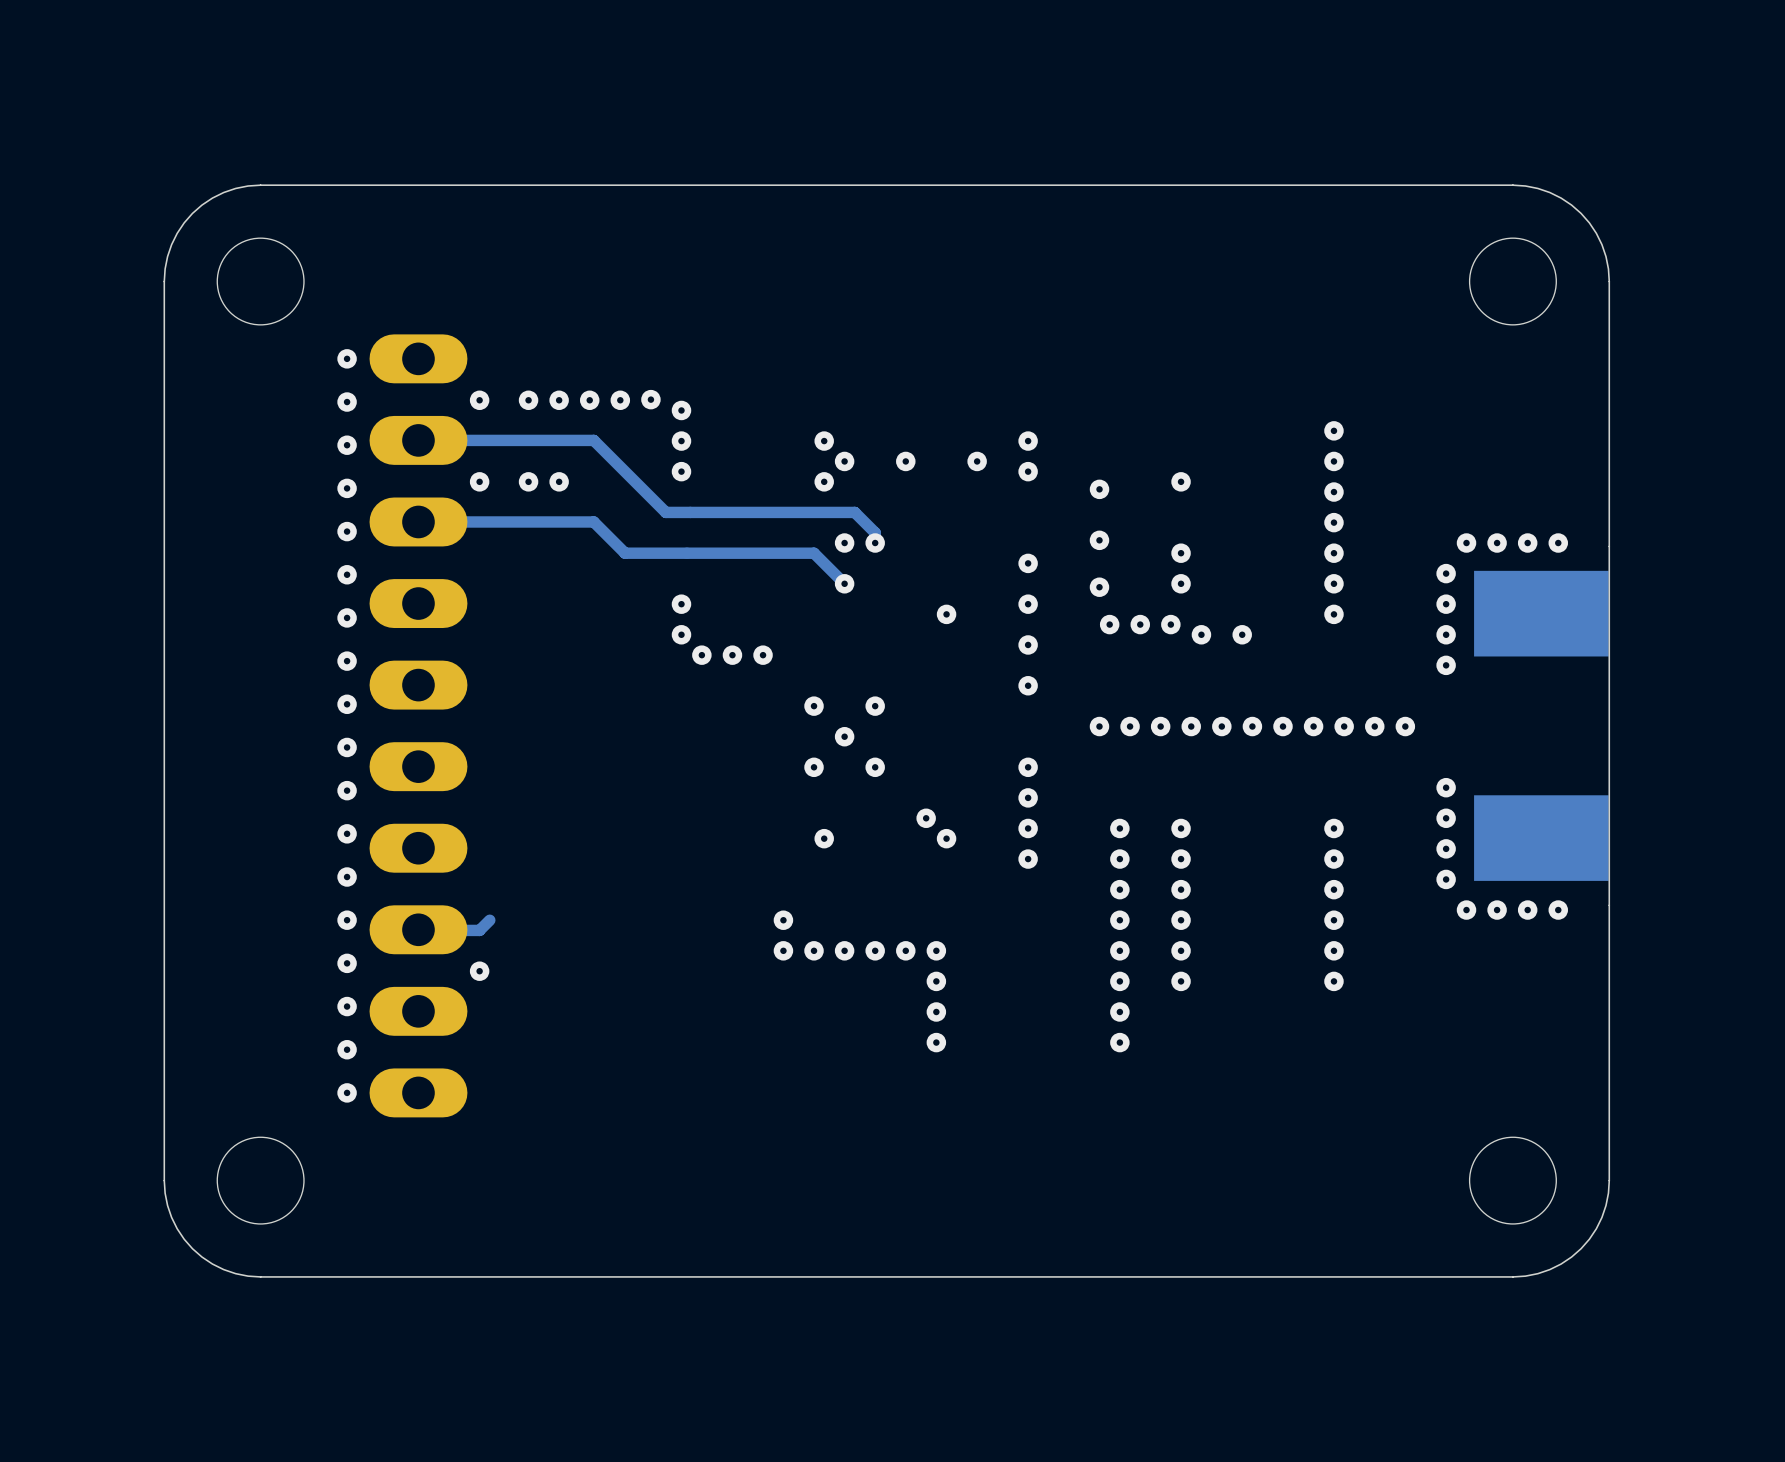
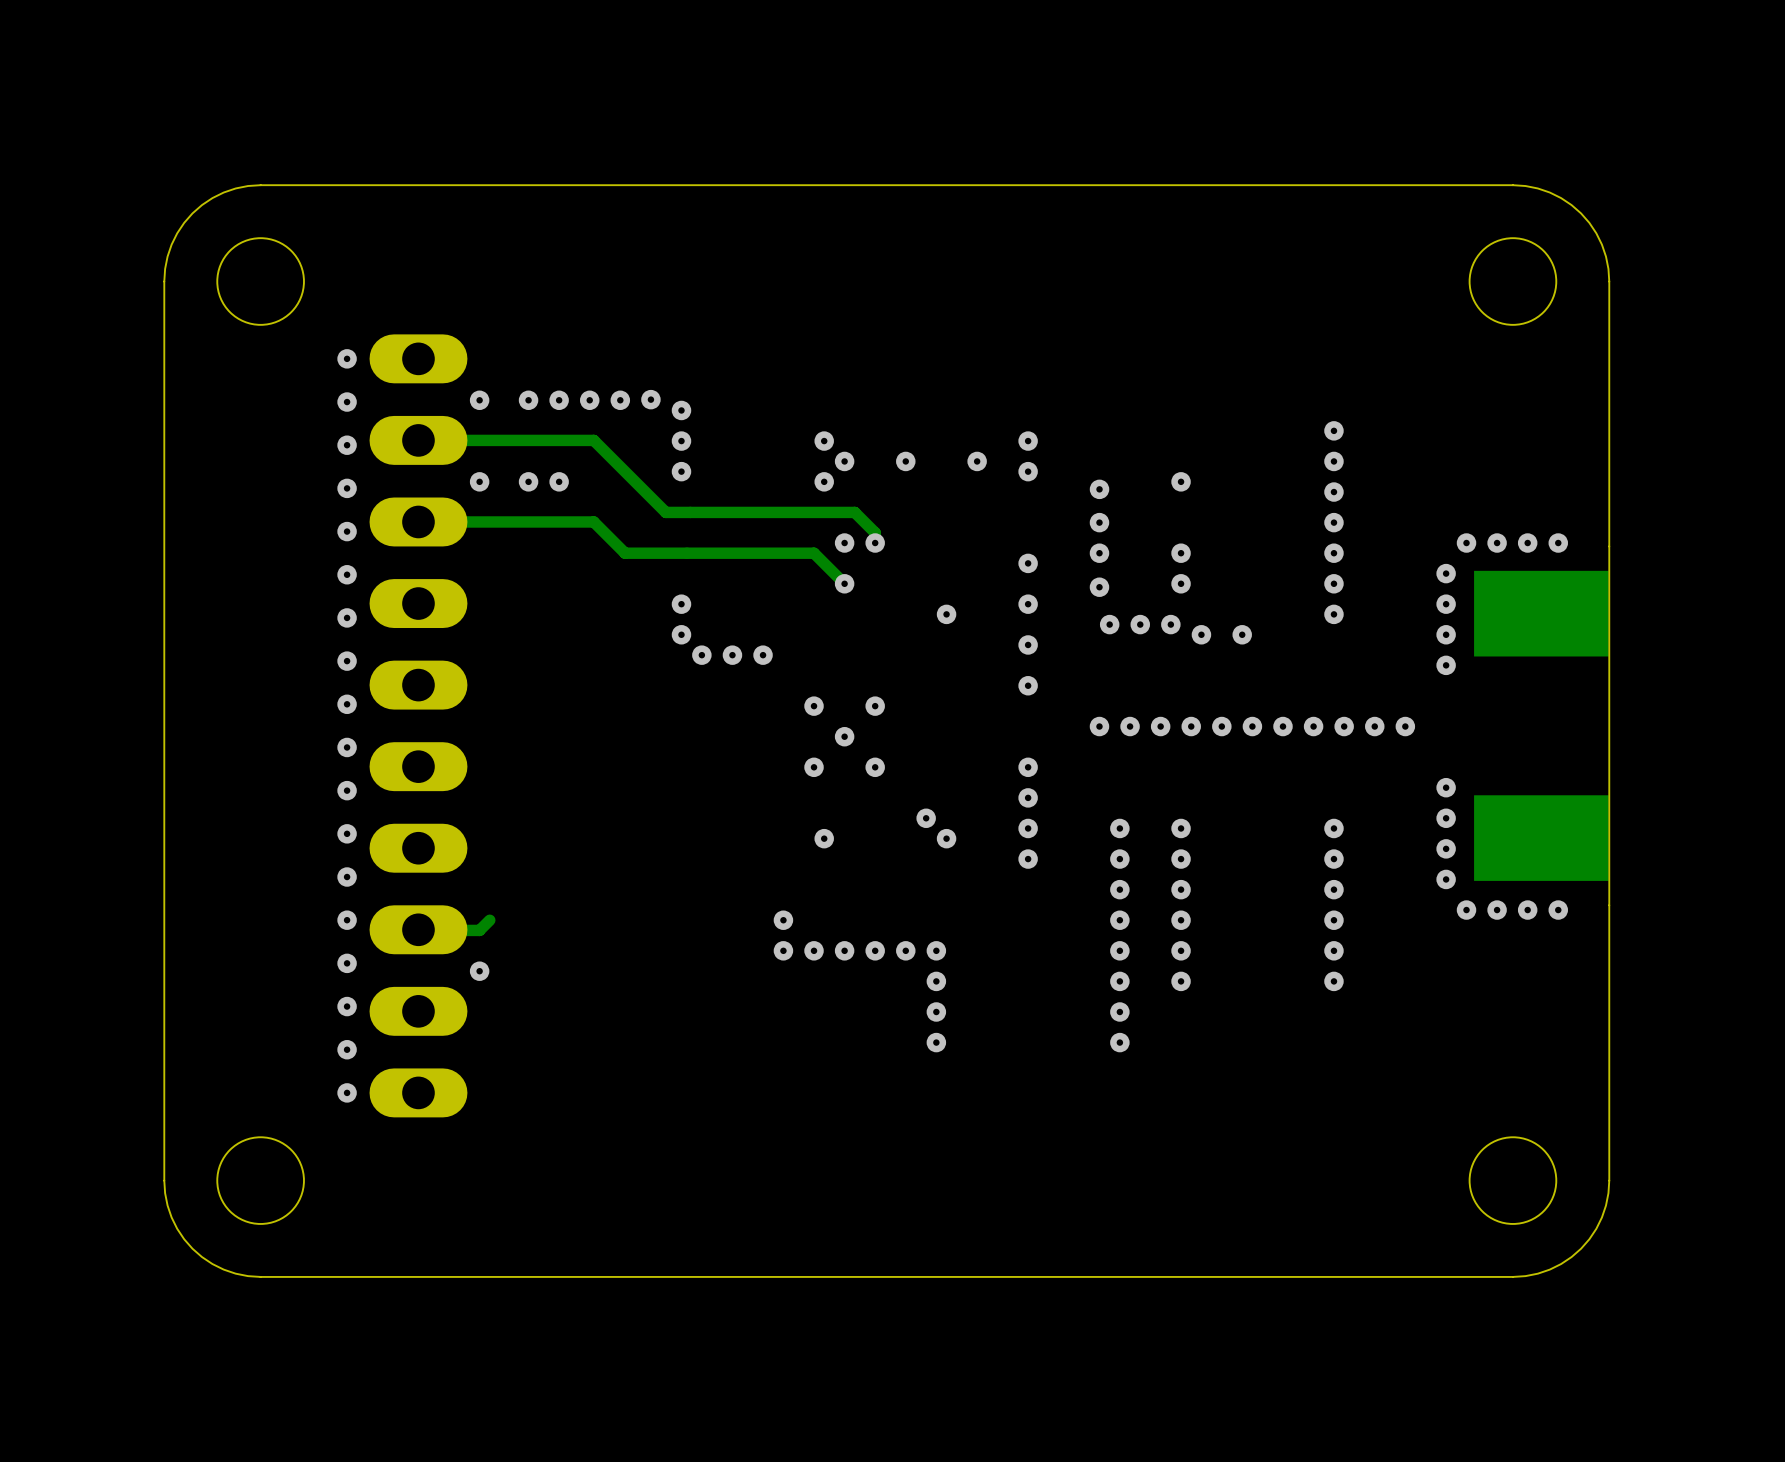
via: none -> (1099, 522)
via: (1099, 540) -> none
via: none -> (1099, 553)

